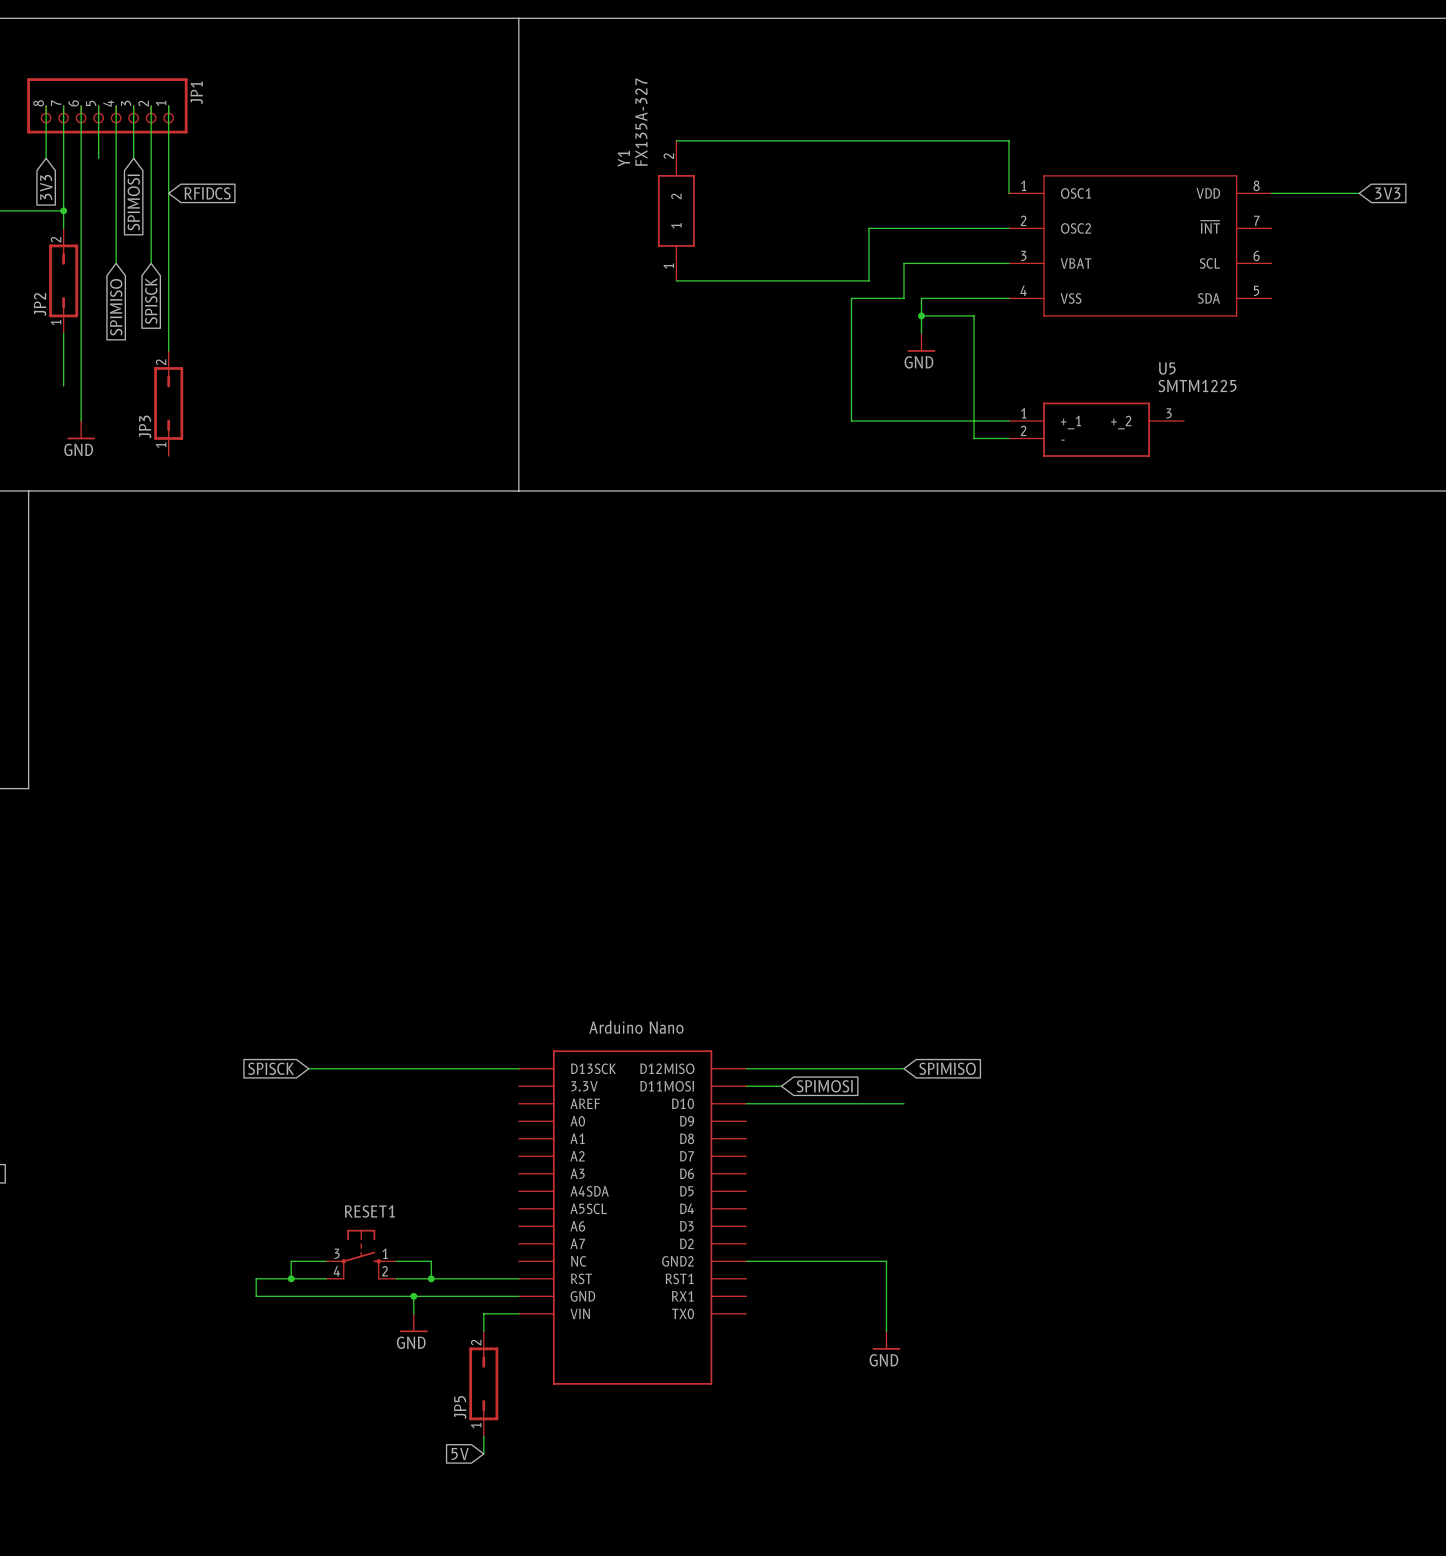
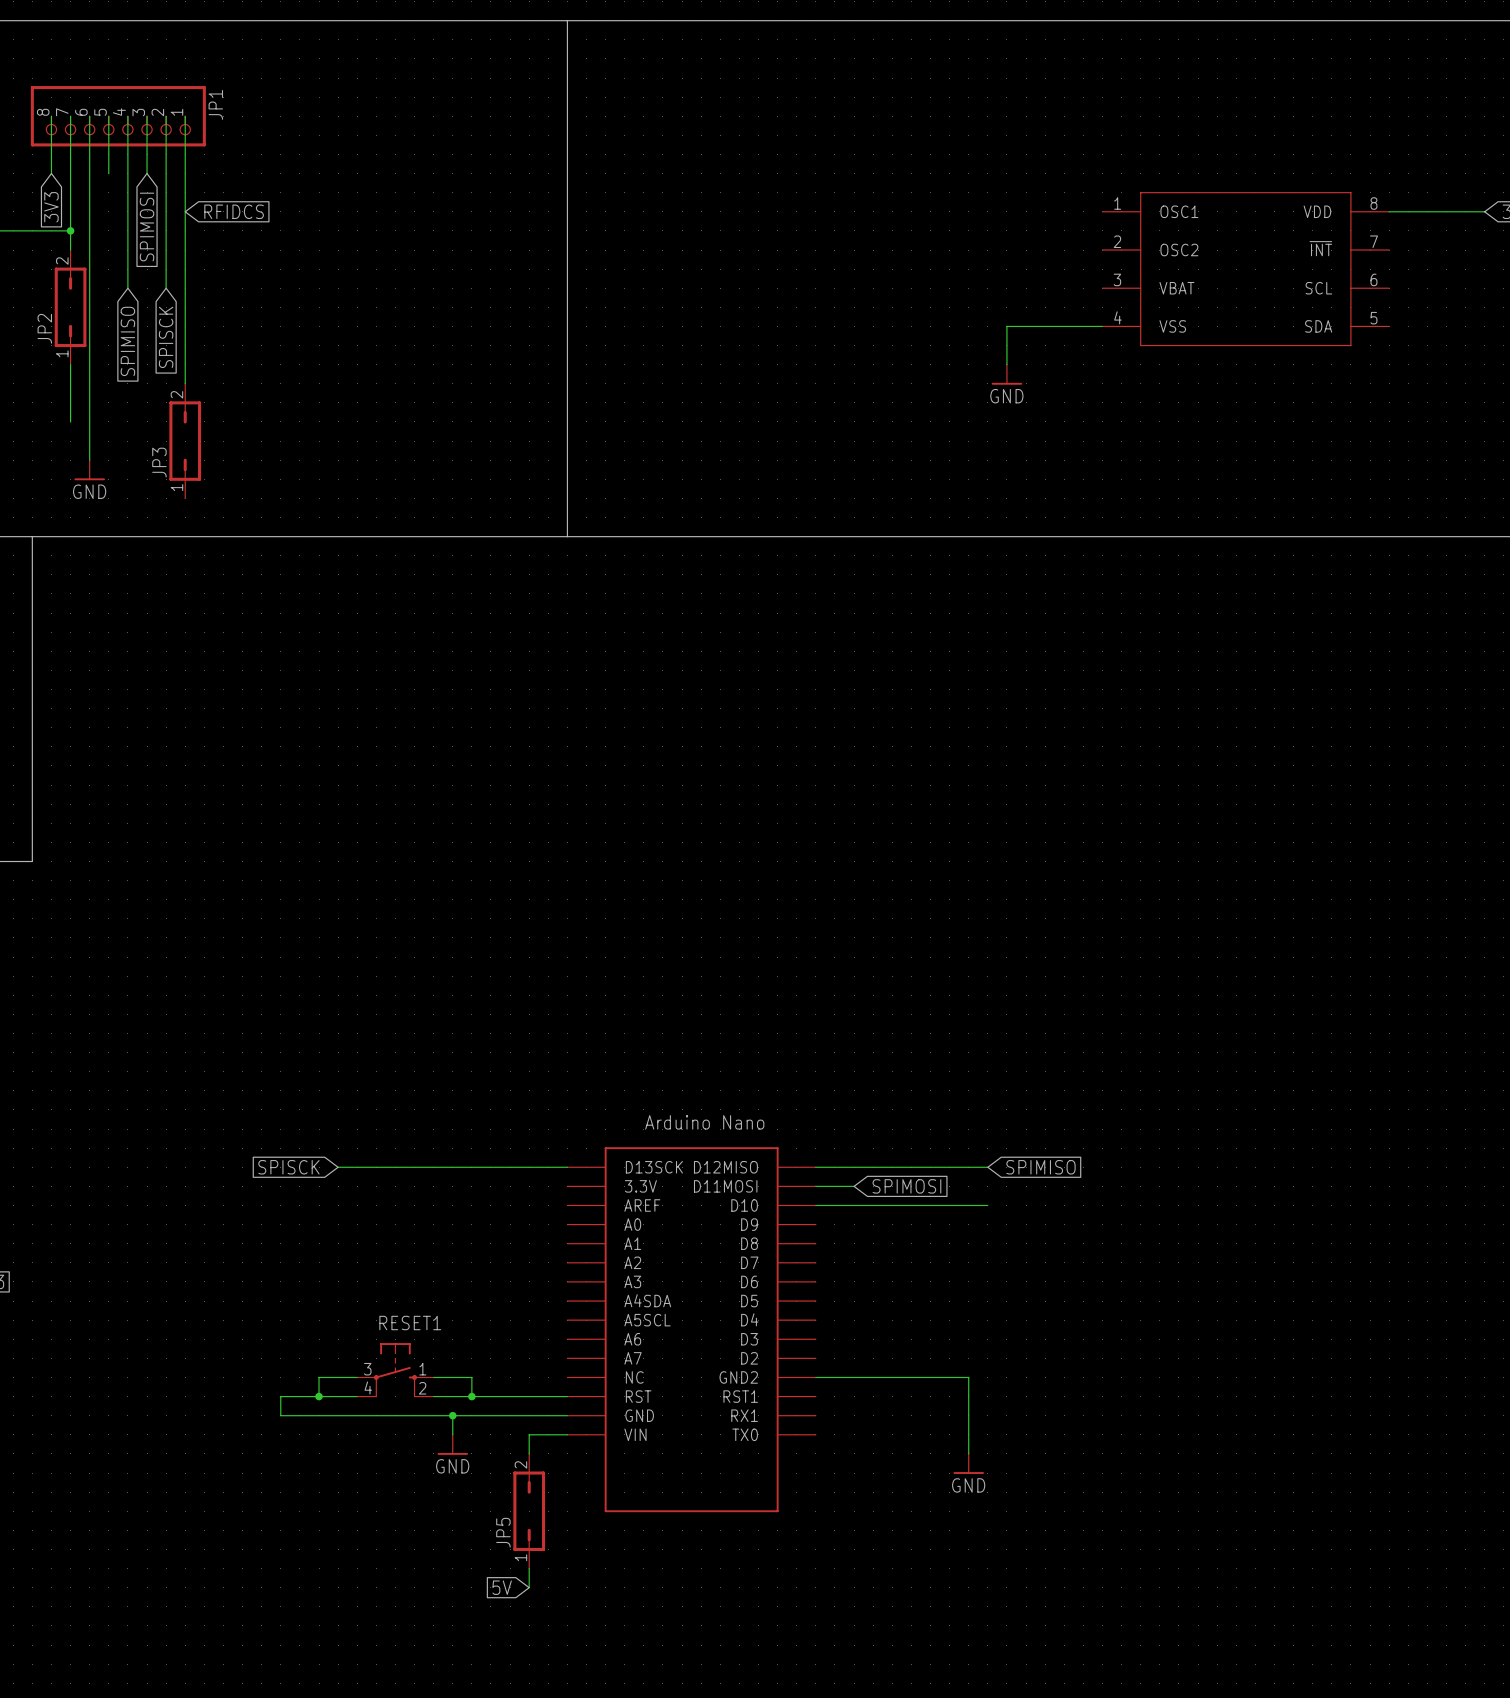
wire: (676, 140) (1009, 140) (1009, 193) -> none
Y1: FX135A-327 (676, 210) -> none
wire: (1009, 228) (868, 228) (868, 280) (676, 280) -> none
wire: (1009, 263) (903, 263) (903, 298) (851, 298) (851, 420) (1009, 420) -> none
wire: (921, 315) (974, 315) (974, 438) (1009, 438) -> none
junction: (921, 315) -> none
U5: SMTM1225 (1096, 429) -> none

